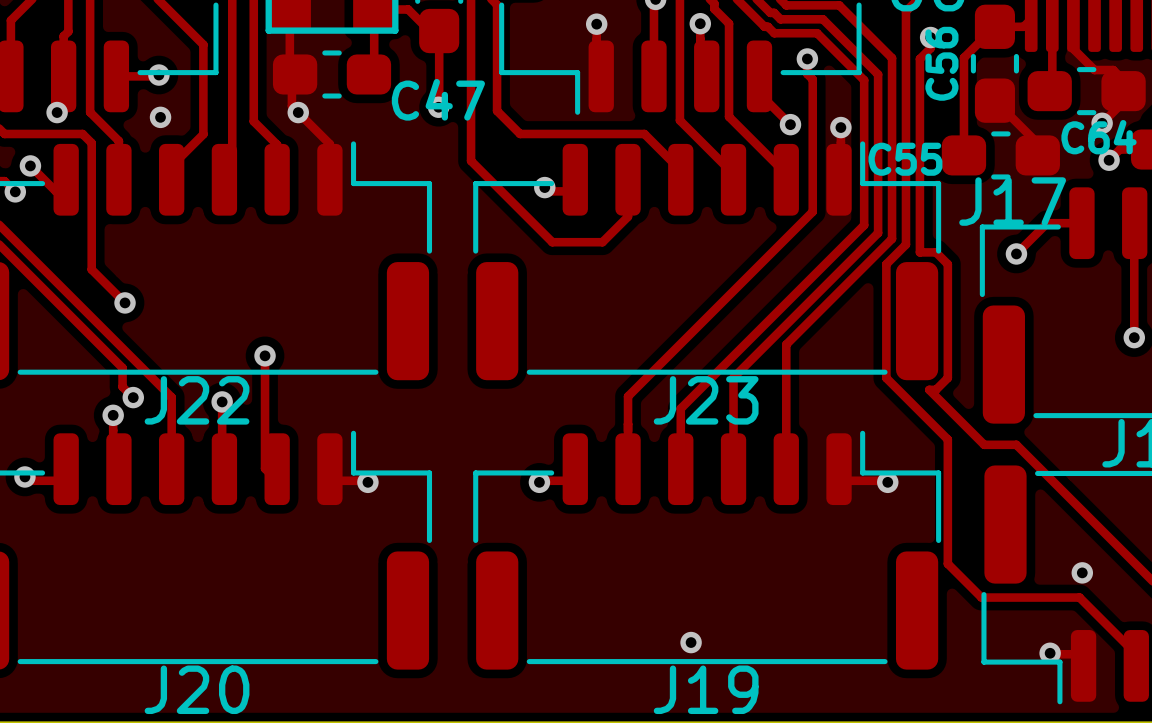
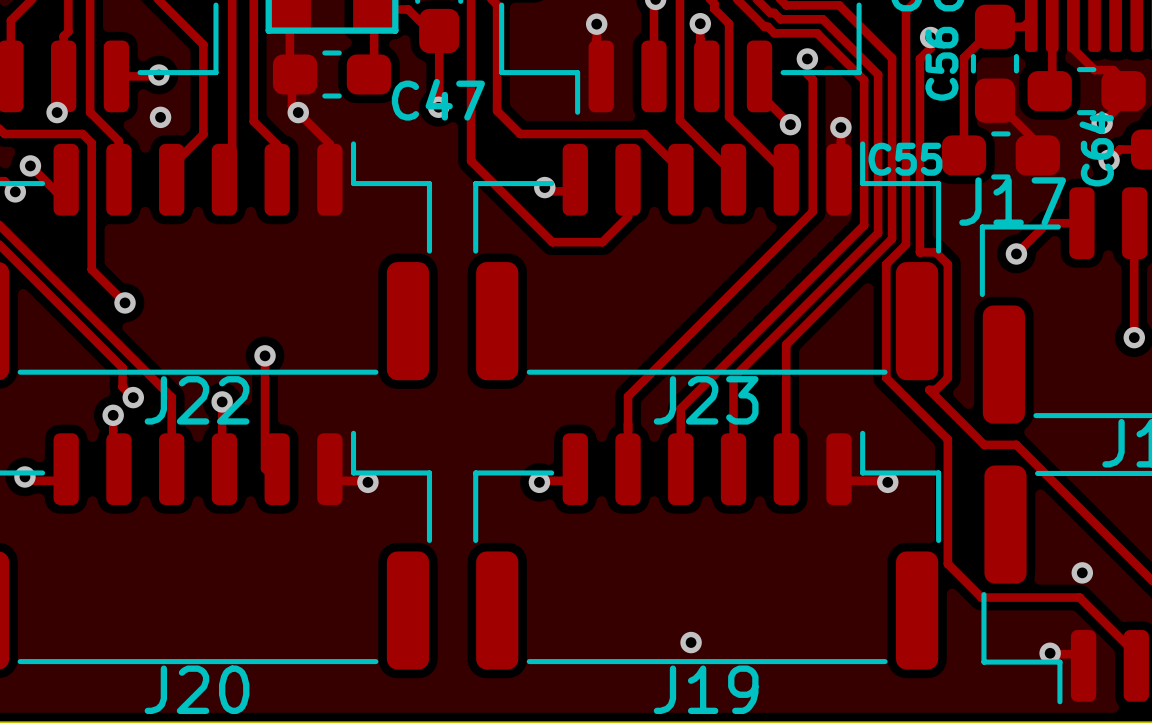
C64 name rotation: 0° (1099, 137) -> 90° counterclockwise (1096, 148)

